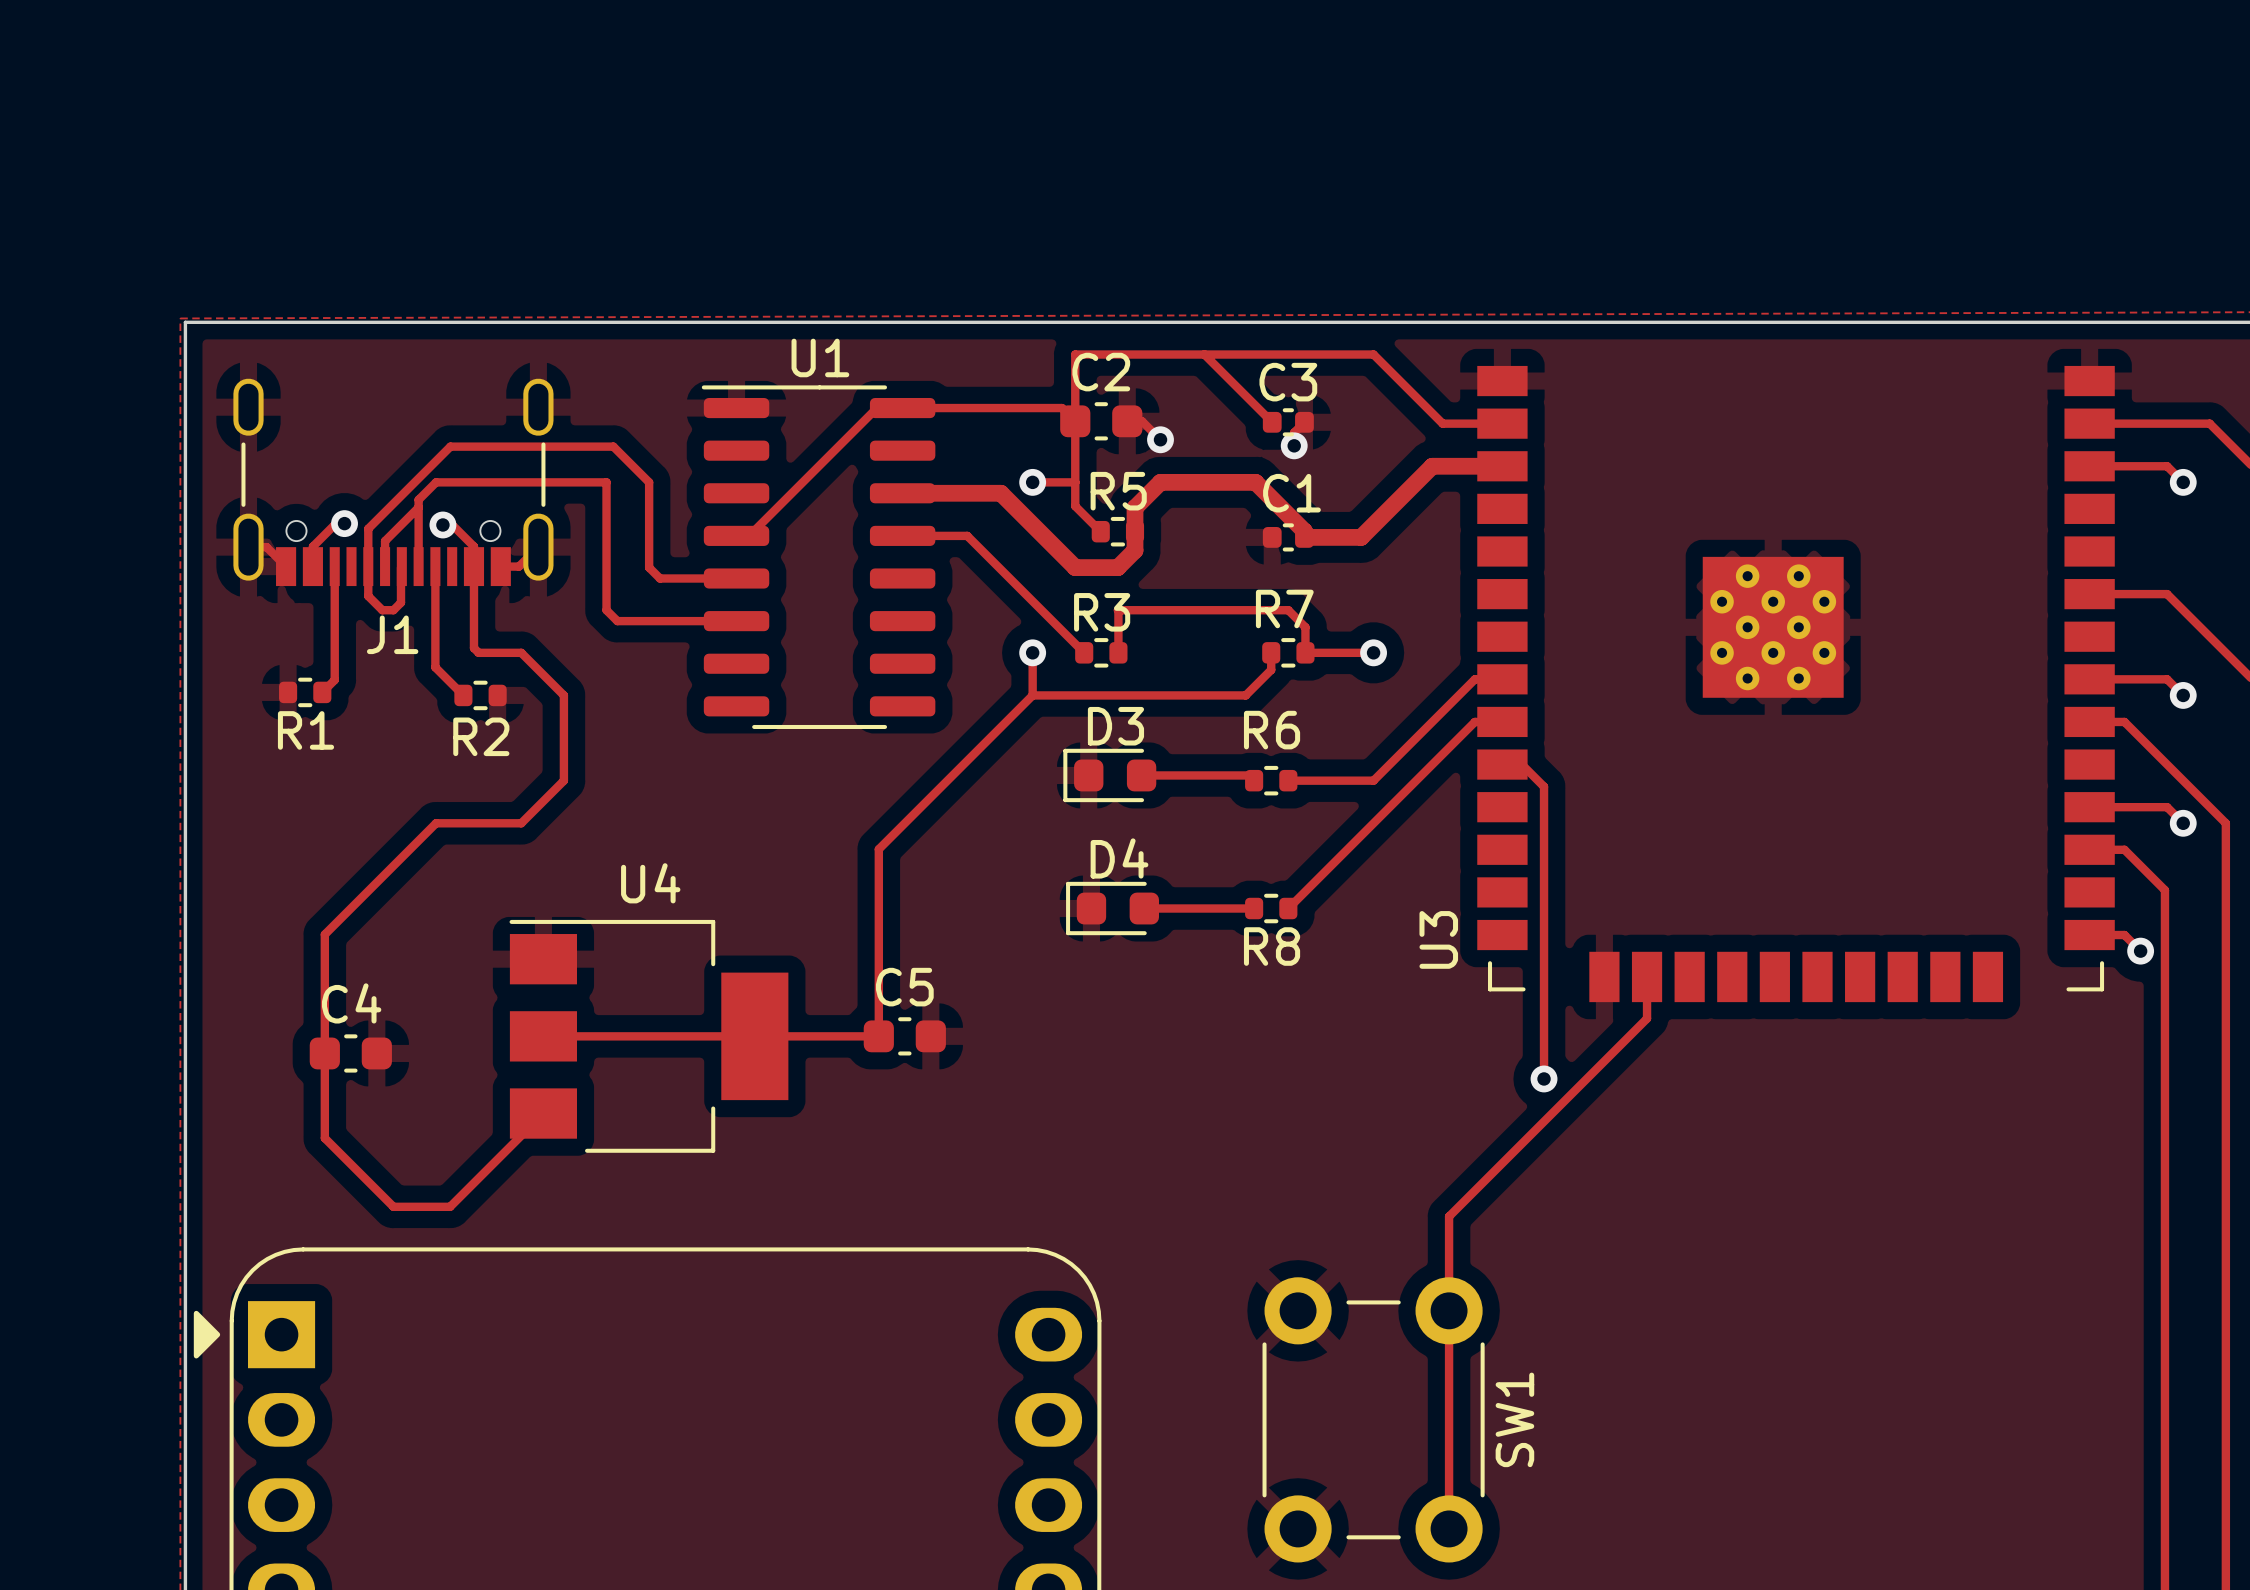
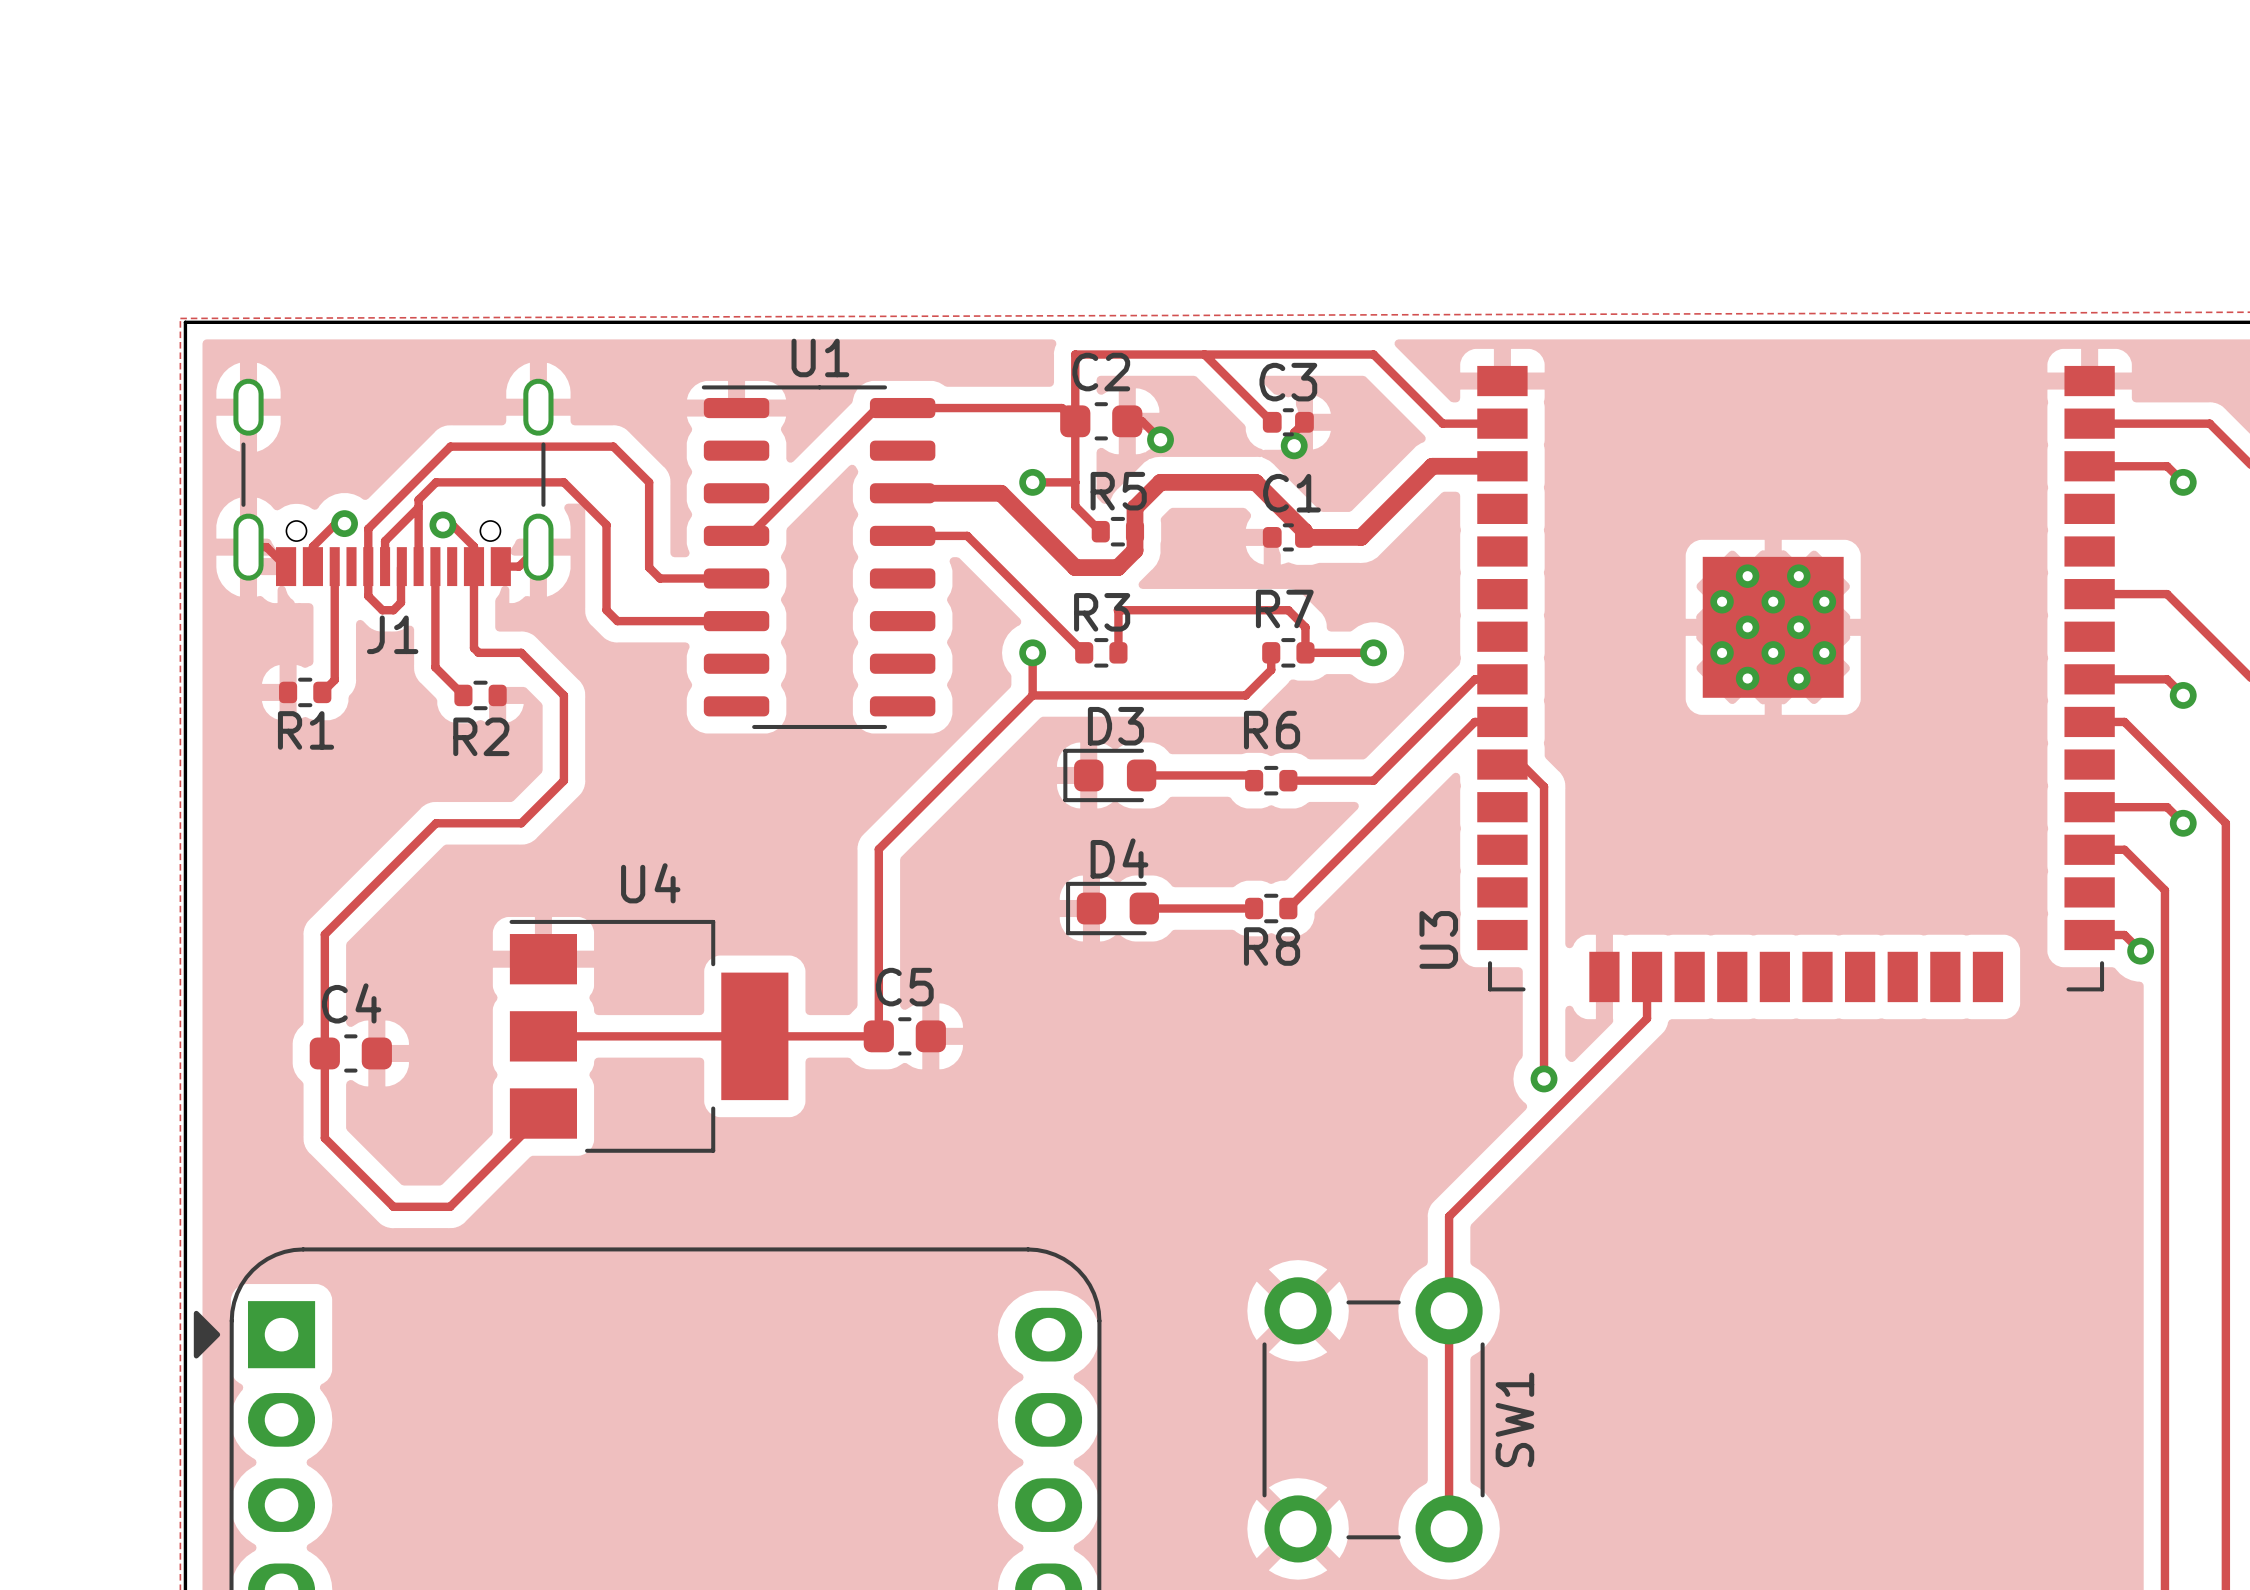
track: (563, 482) (606, 482) (606, 524) -> (563, 482) (606, 524)

